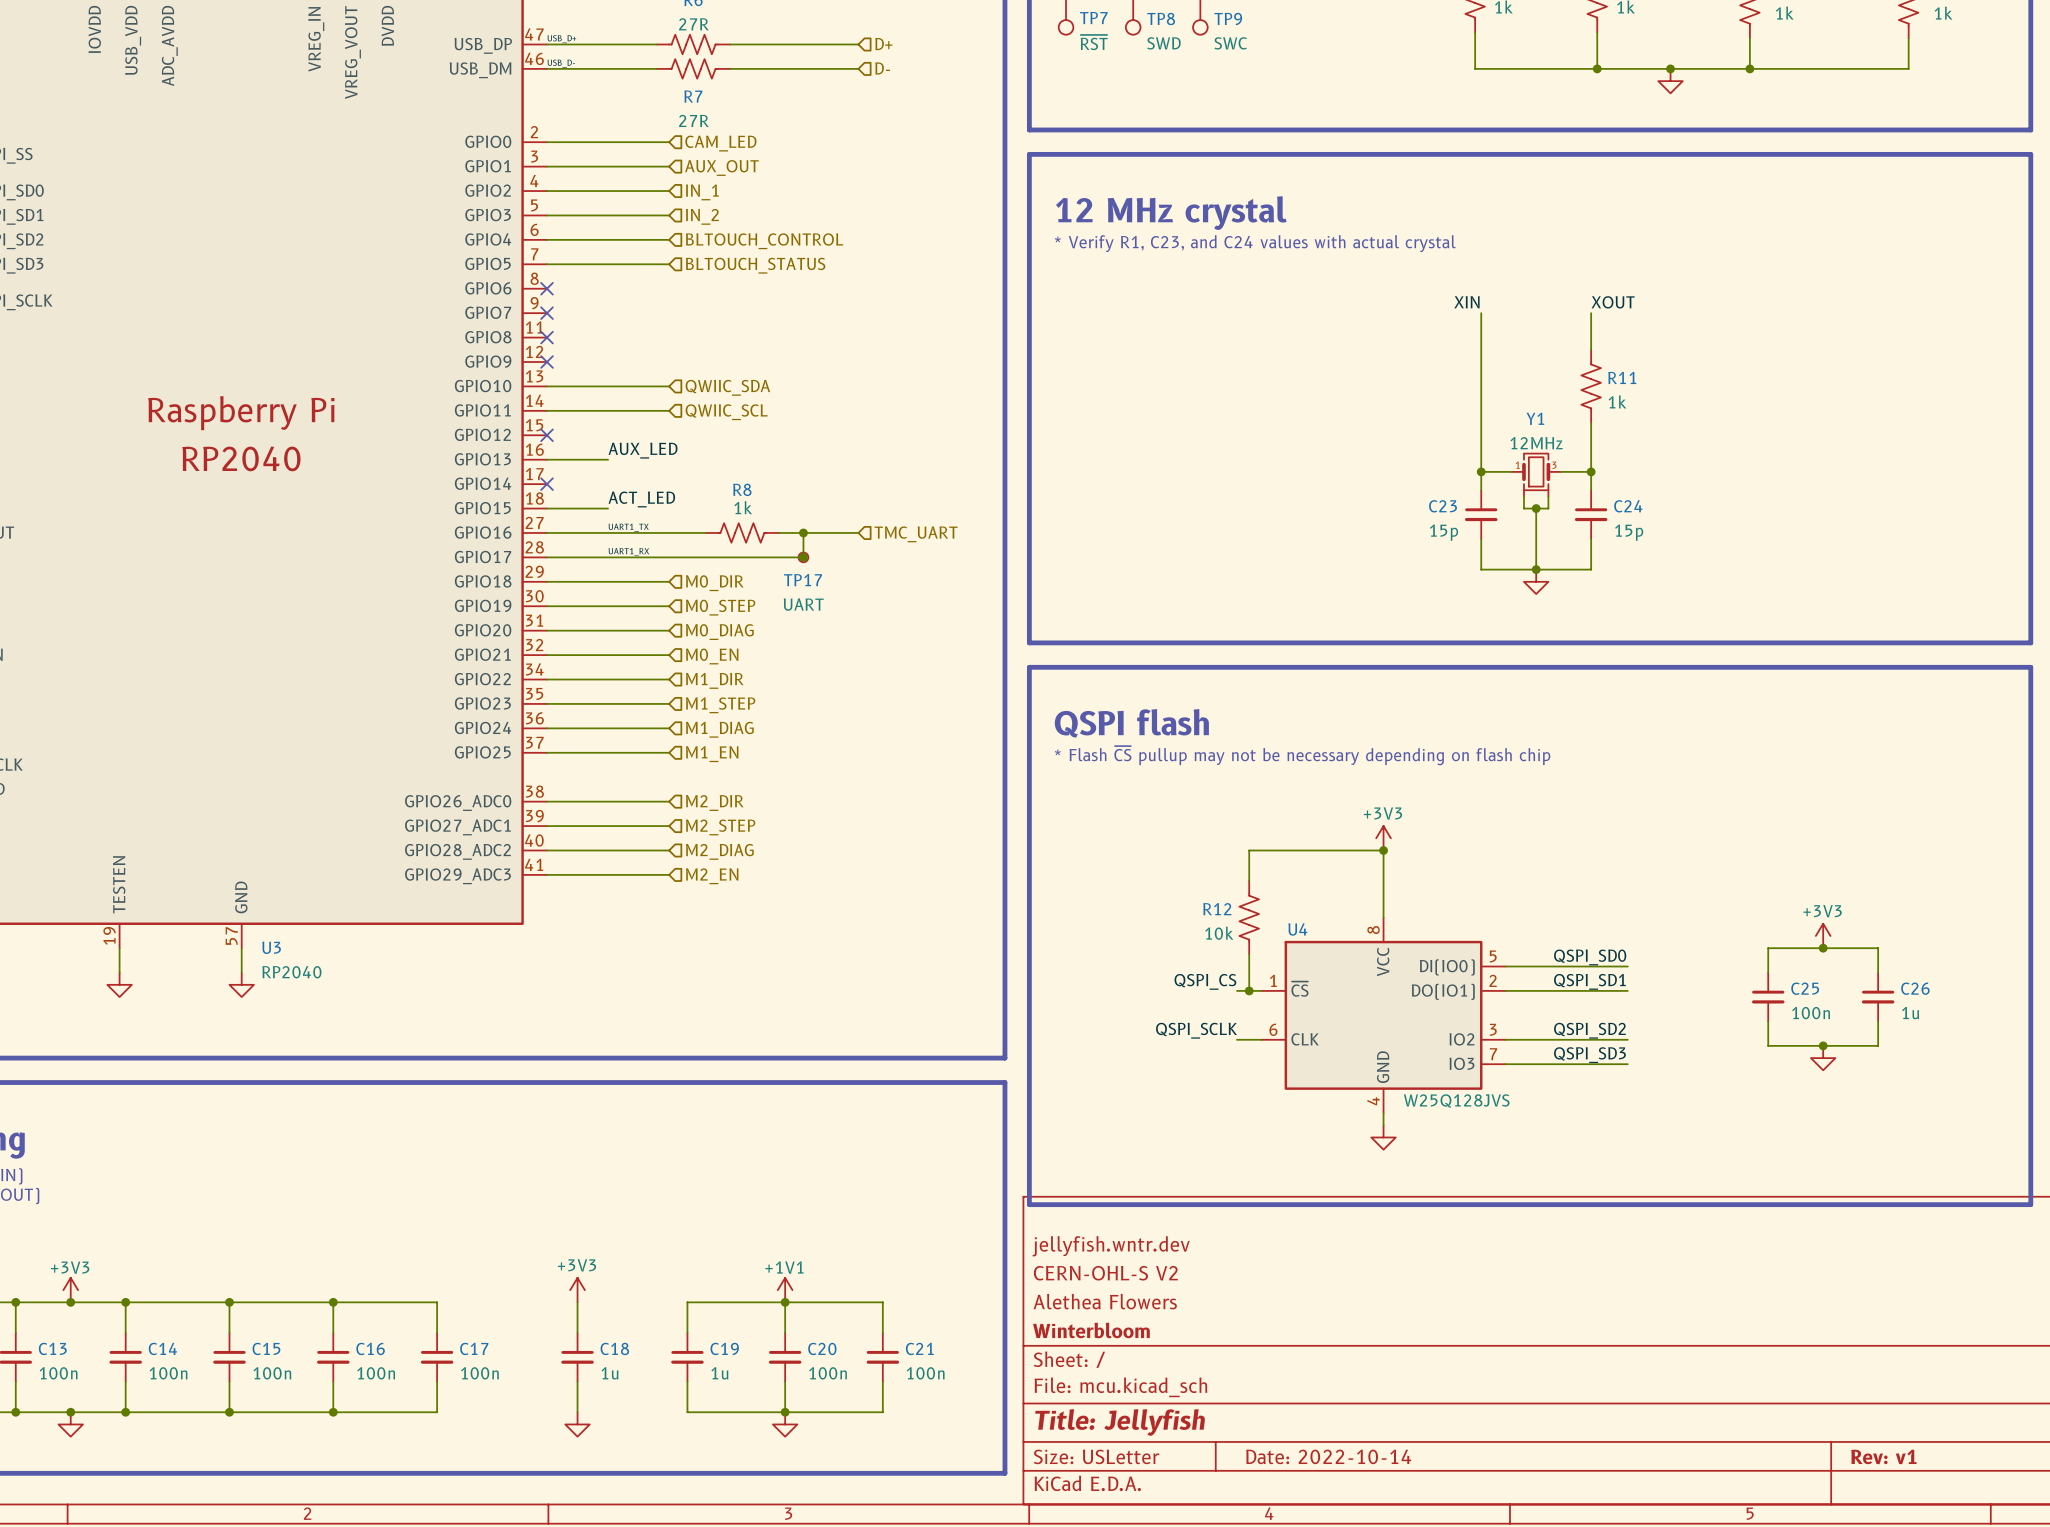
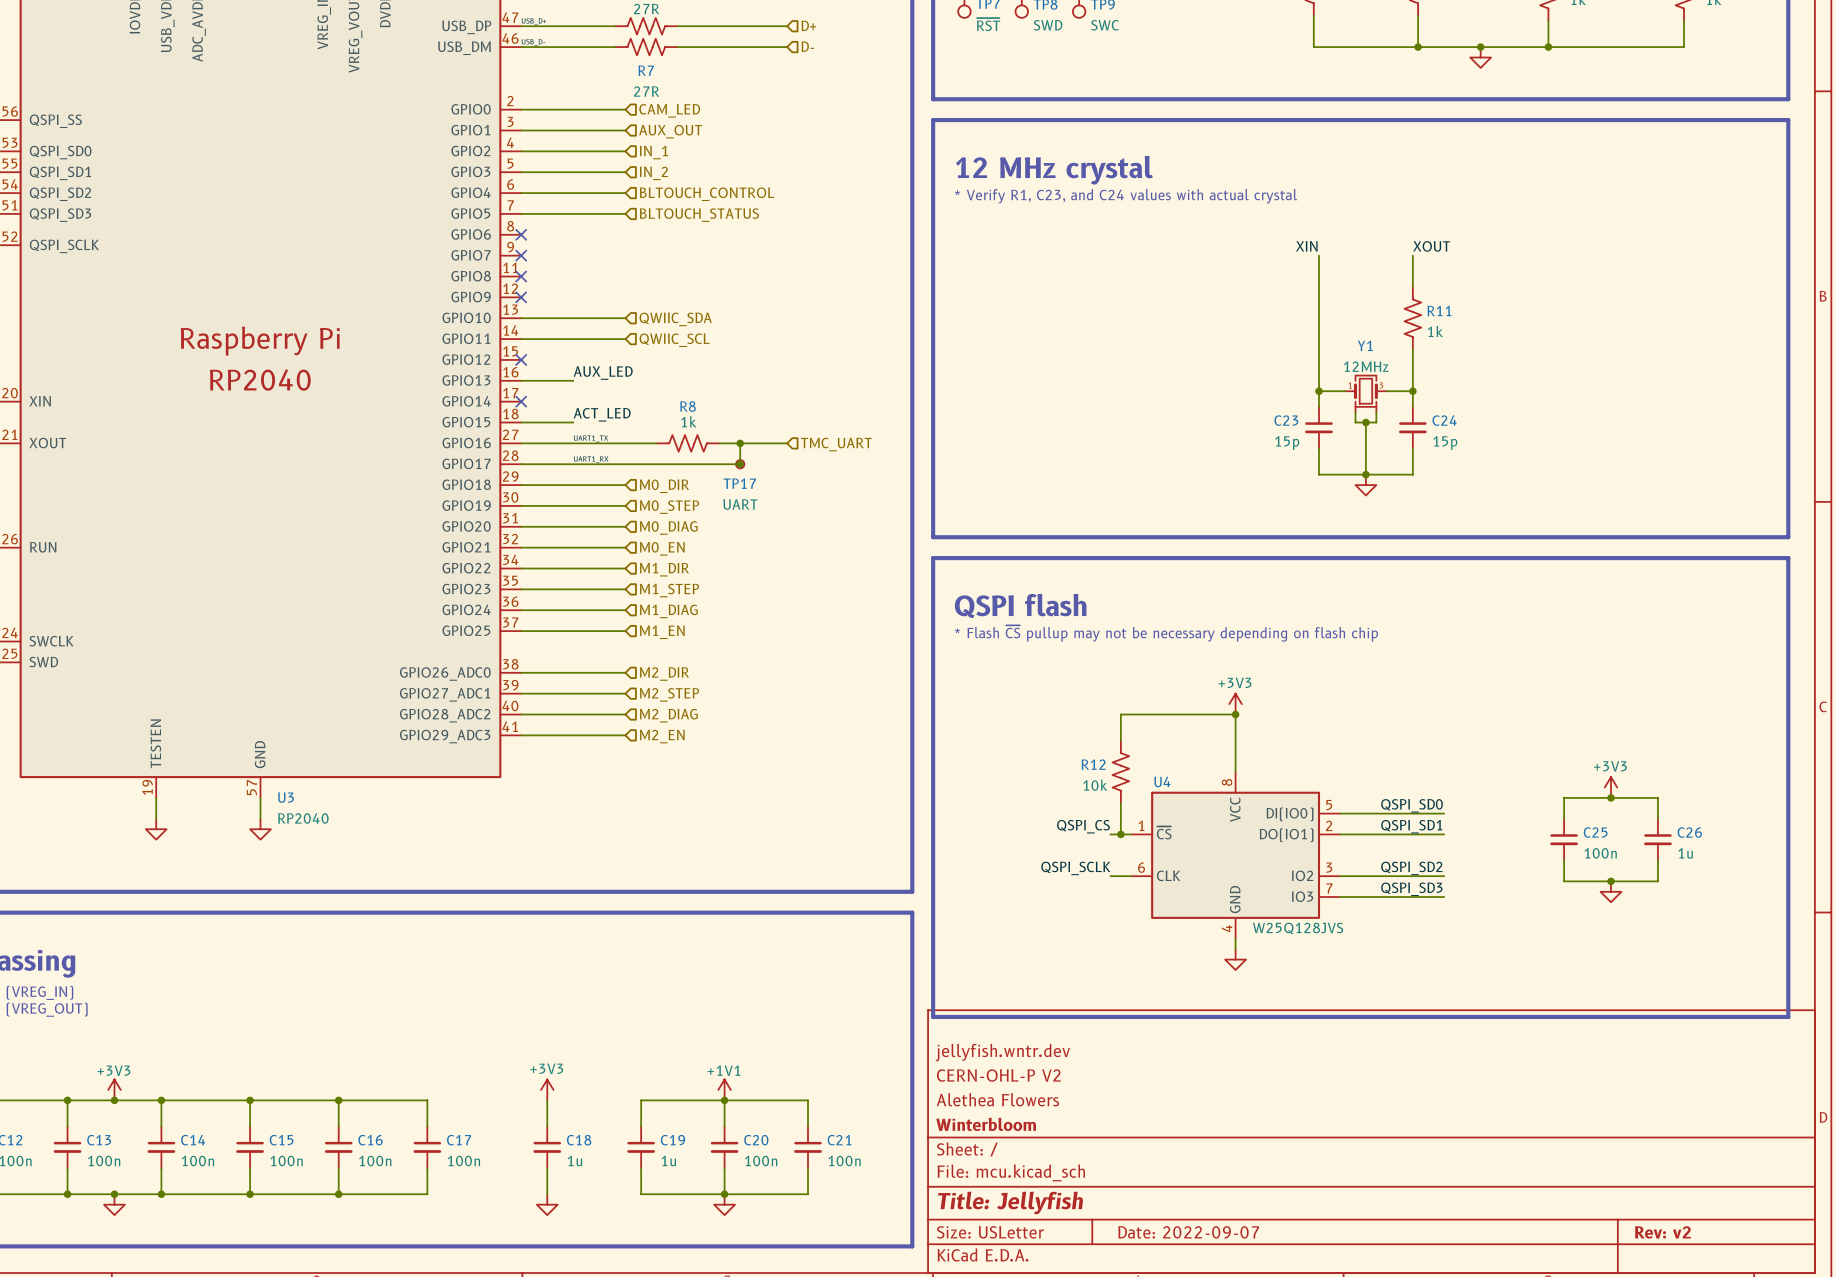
title block: CERN-OHL-S V2 (1105, 1273) -> CERN-OHL-P V2 (998, 1075)
title block: Date: 2022-10-14 (1328, 1456) -> Date: 2022-09-07 (1188, 1232)
title block: Rev: v1 (1883, 1456) -> Rev: v2 (1662, 1232)

